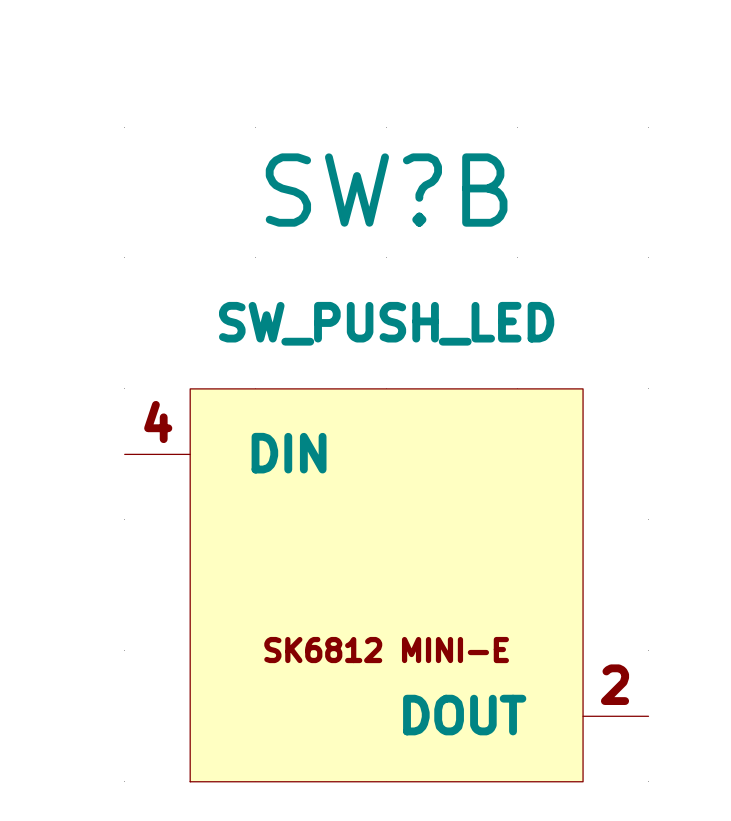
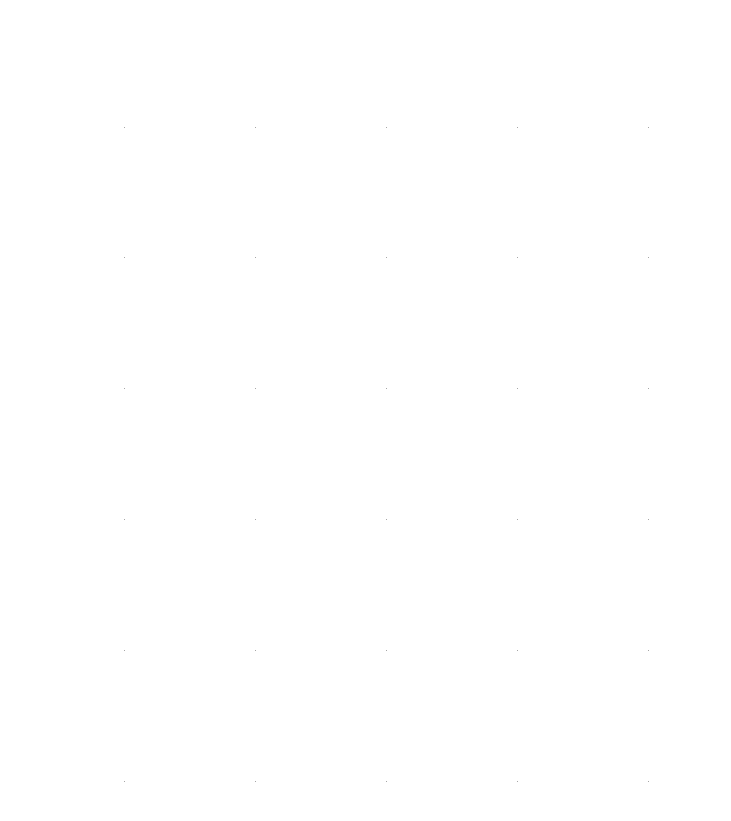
SW?B: SW_PUSH_LED (386, 585) -> none

